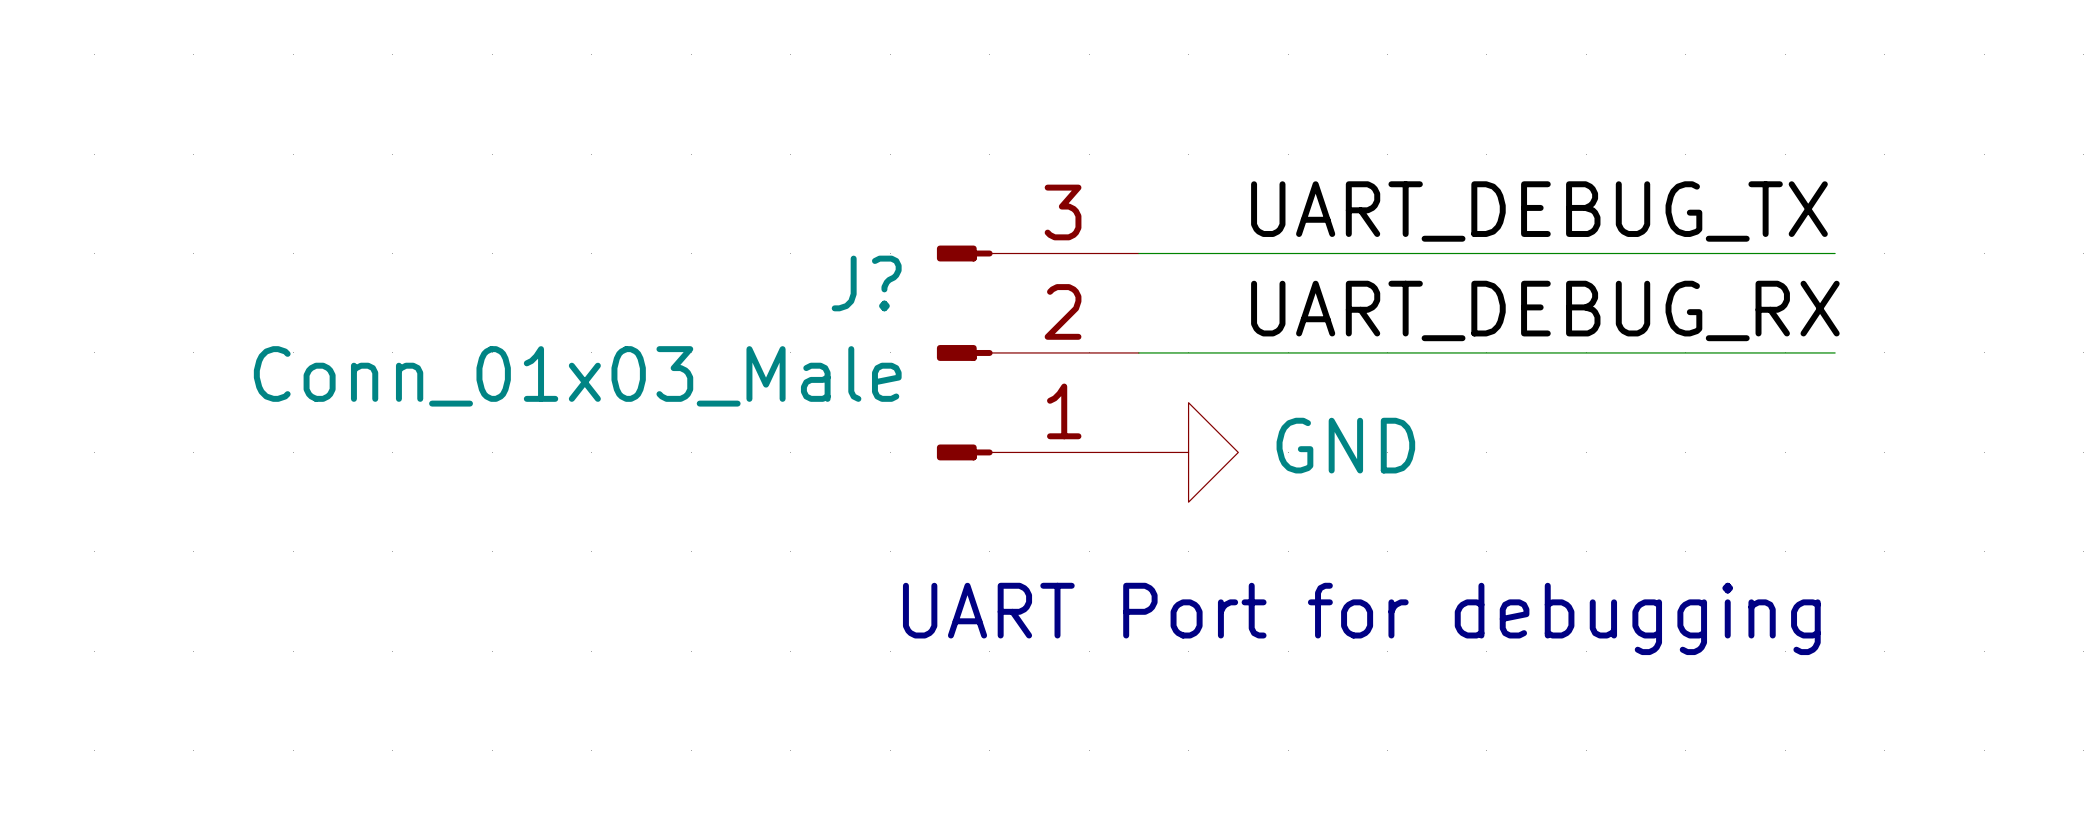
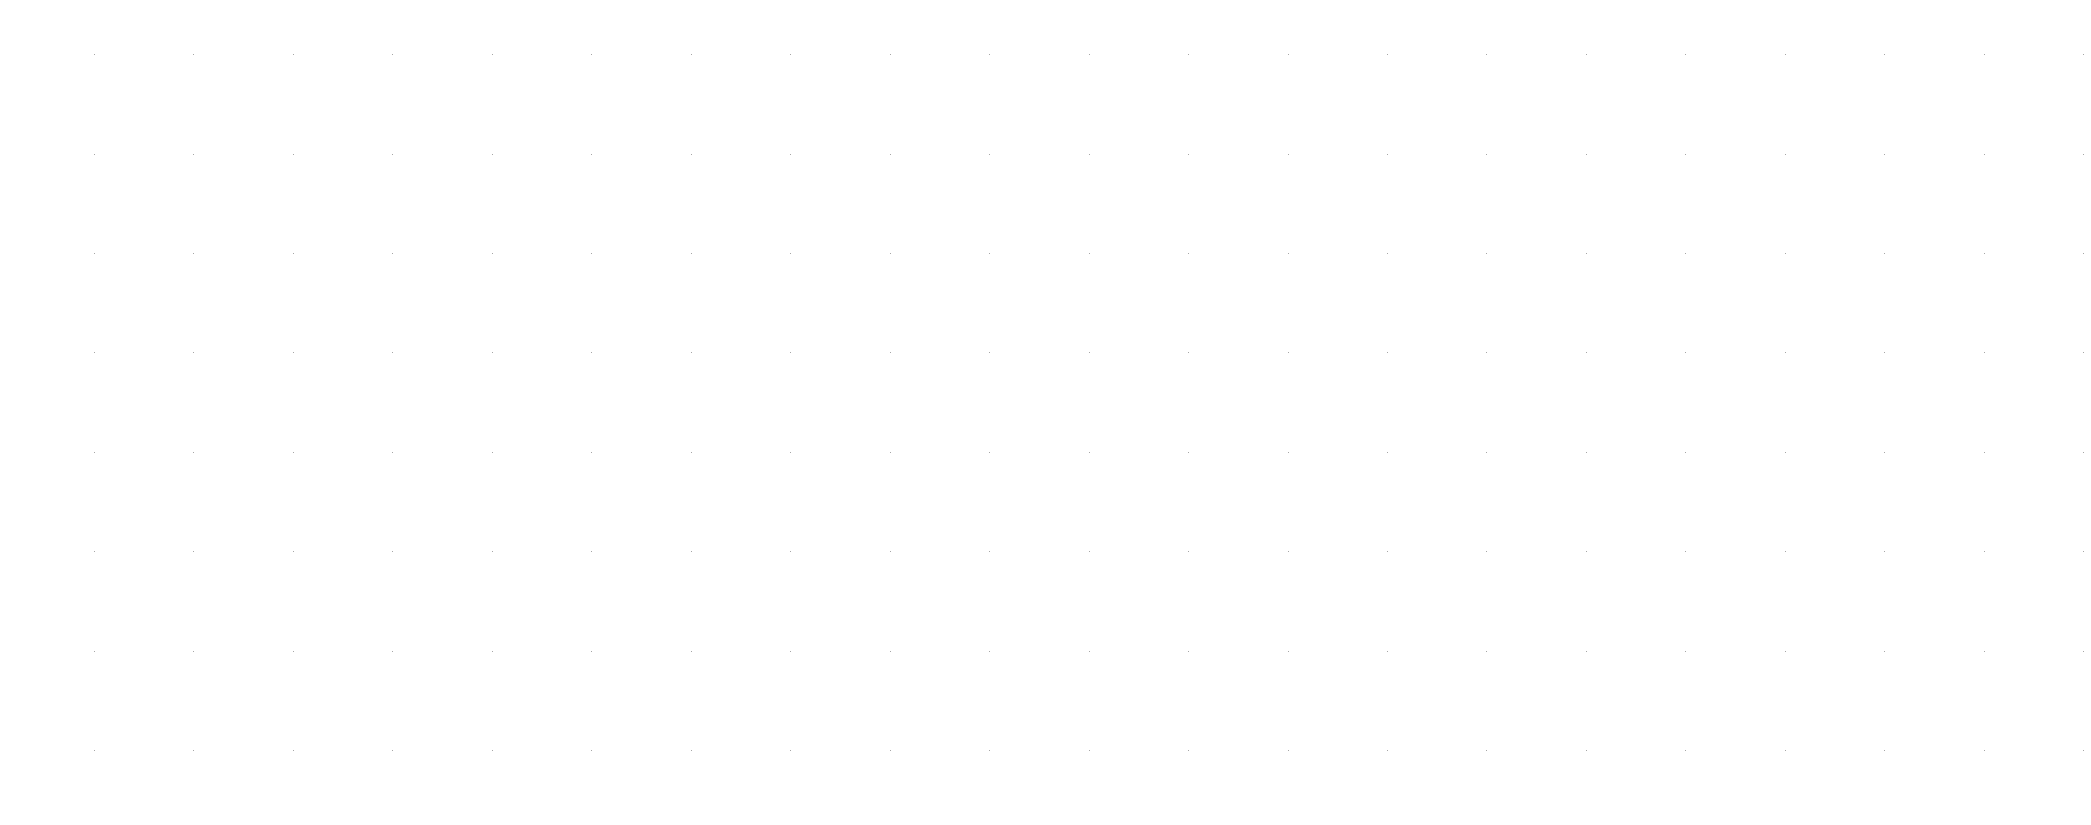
label: UART_DEBUG_TX (1539, 211) -> none
wire: (1138, 253) (1835, 253) -> none
label: UART_DEBUG_RX (1545, 310) -> none
J?: Conn_01x03_Male (1037, 352) -> none
wire: (1138, 352) (1835, 352) -> none
power symbol: GND (1188, 452) -> none
text: UART Port for debugging (1361, 618) -> none

